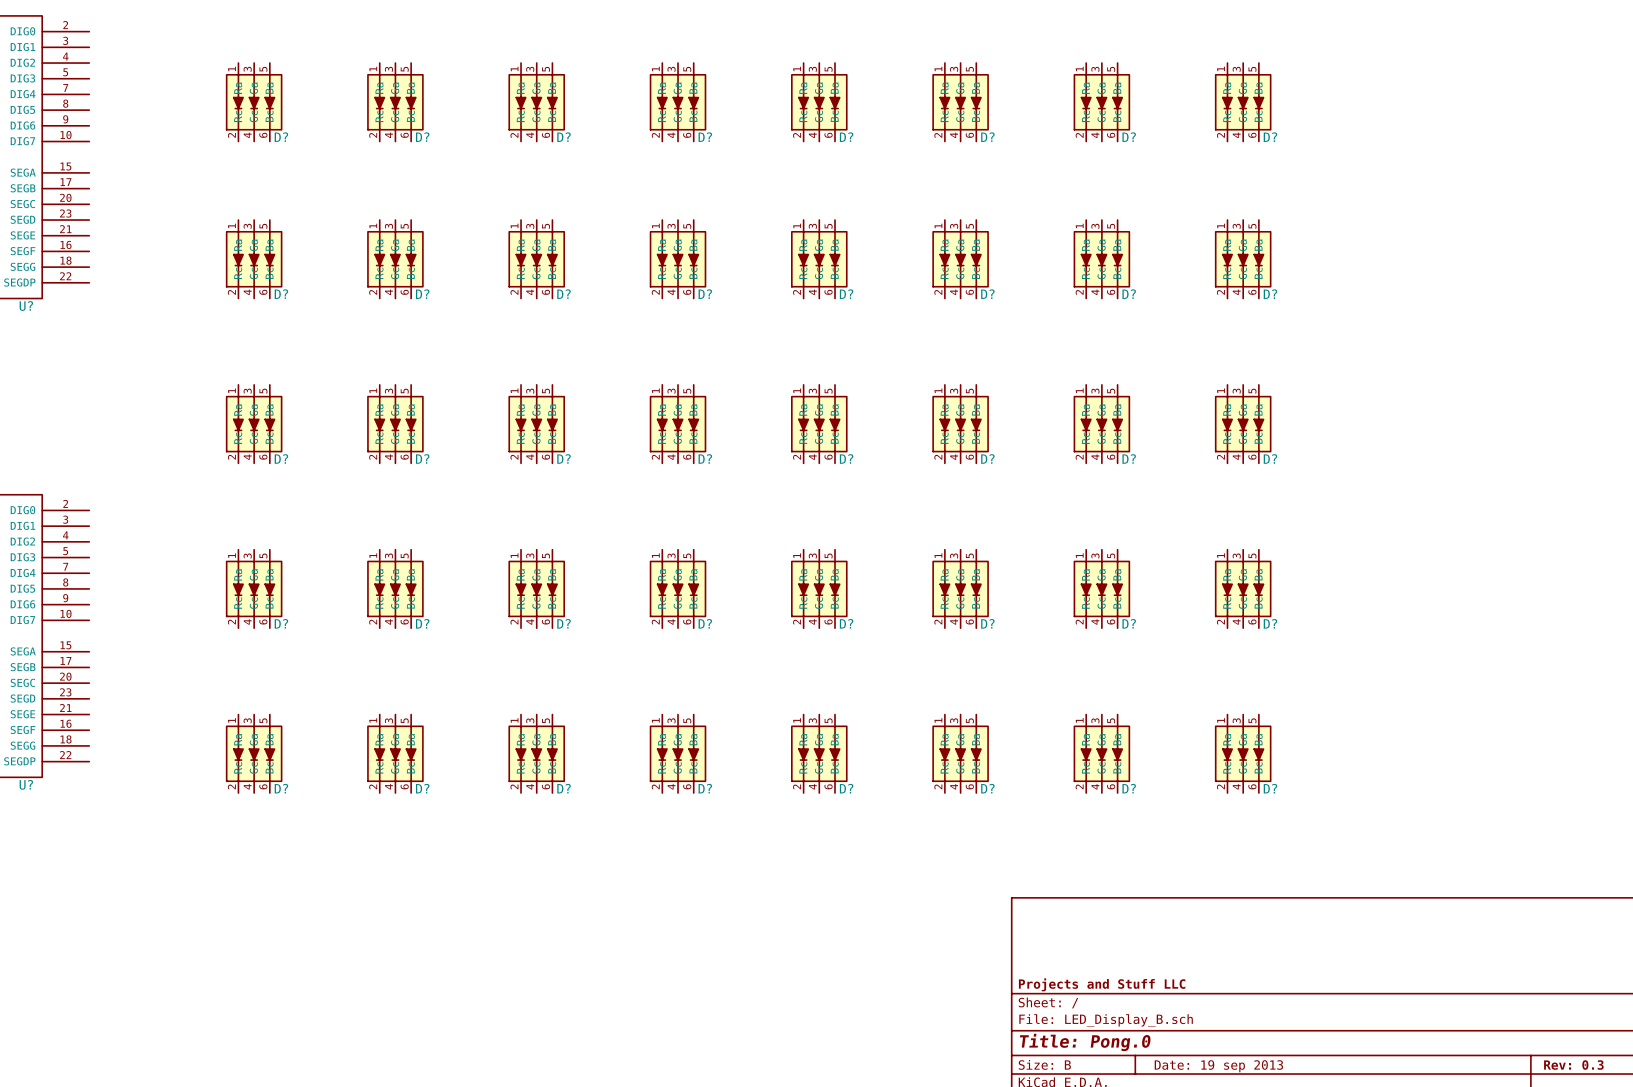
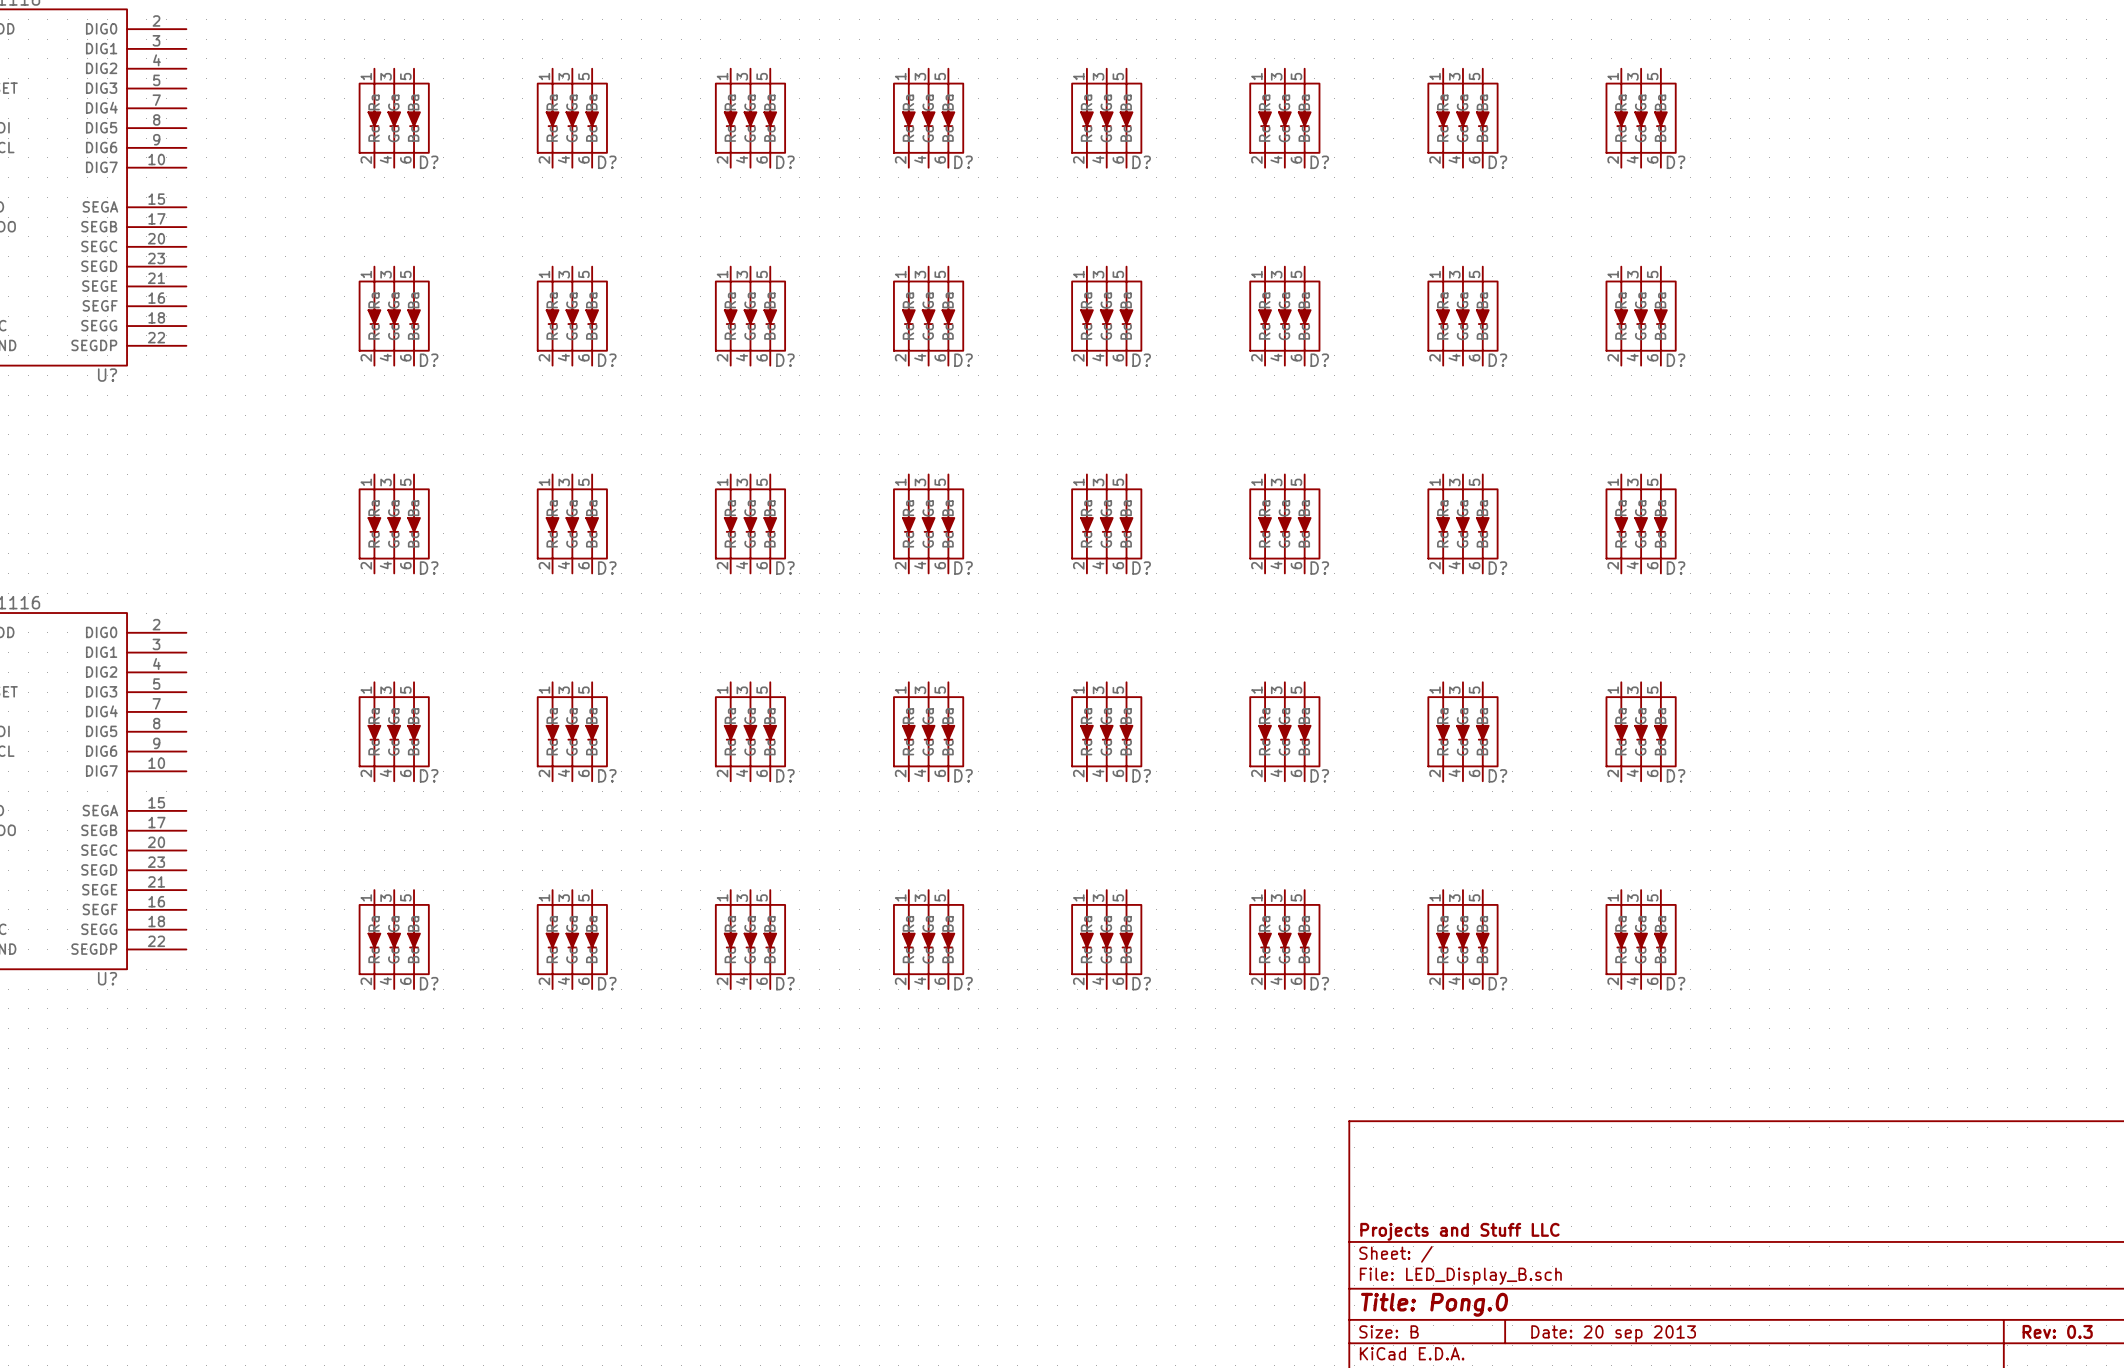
title block: Date: 19 sep 2013 (1218, 1066) -> Date: 20 sep 2013 (1613, 1333)

